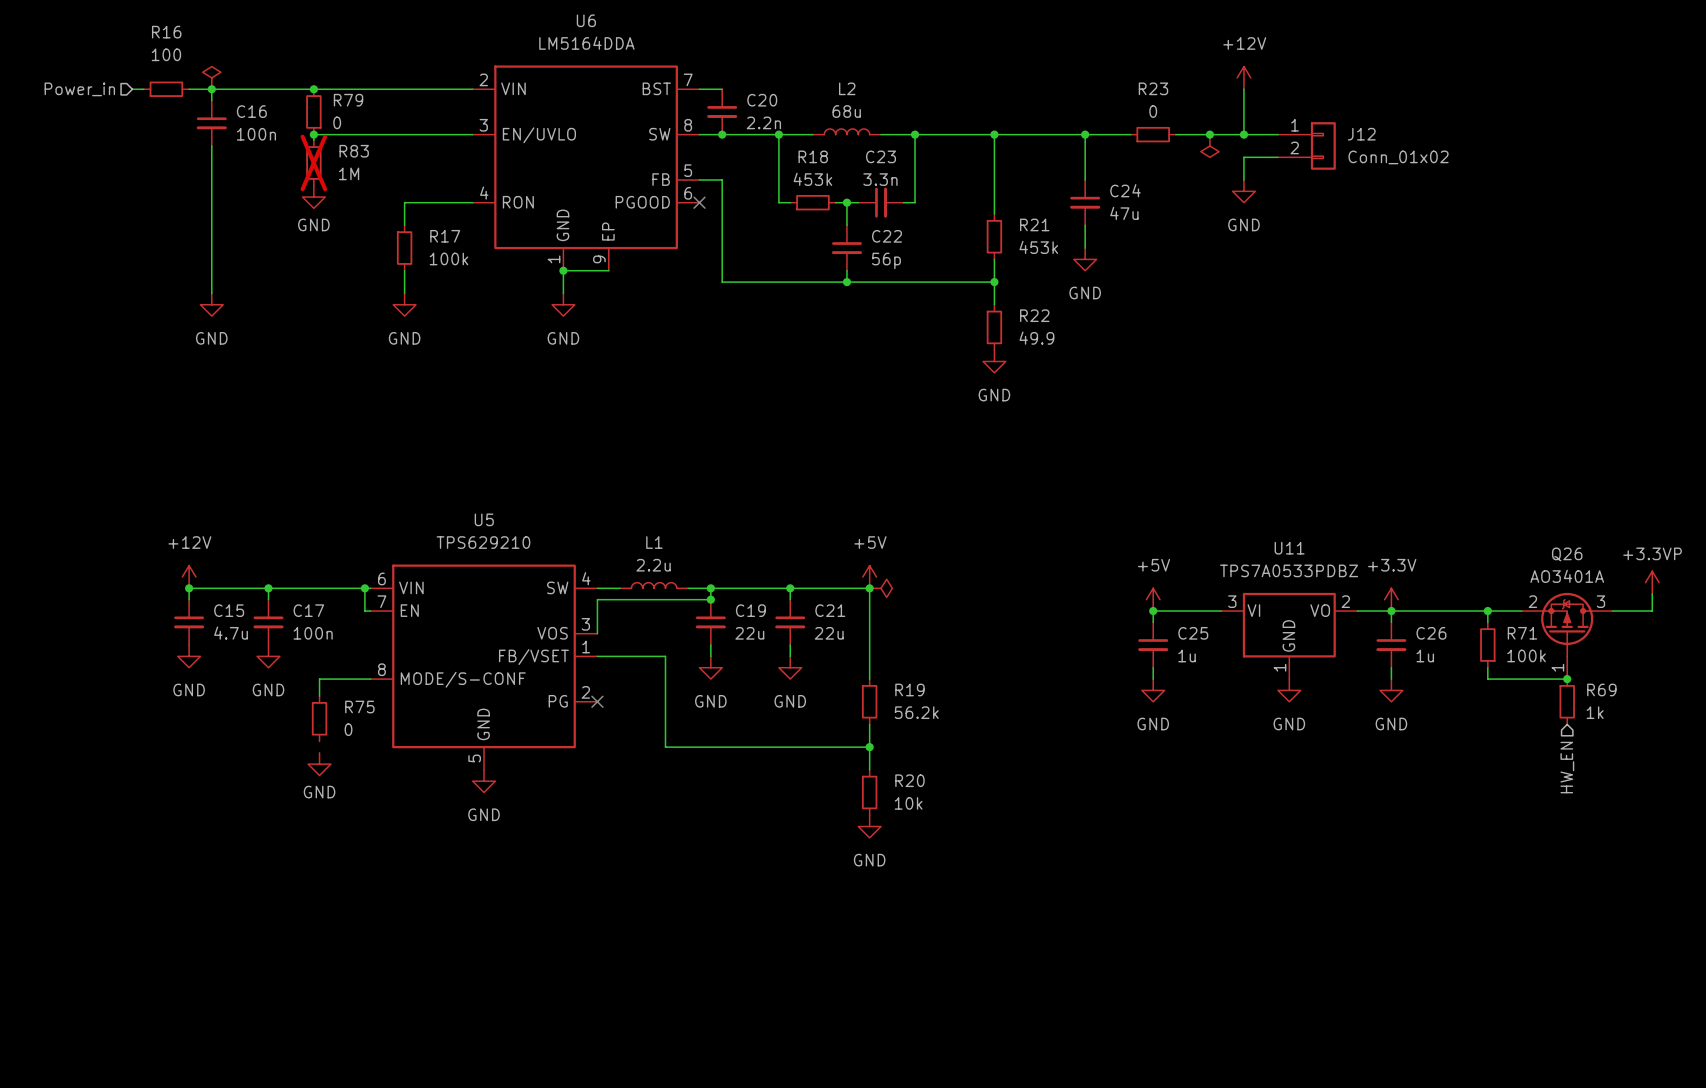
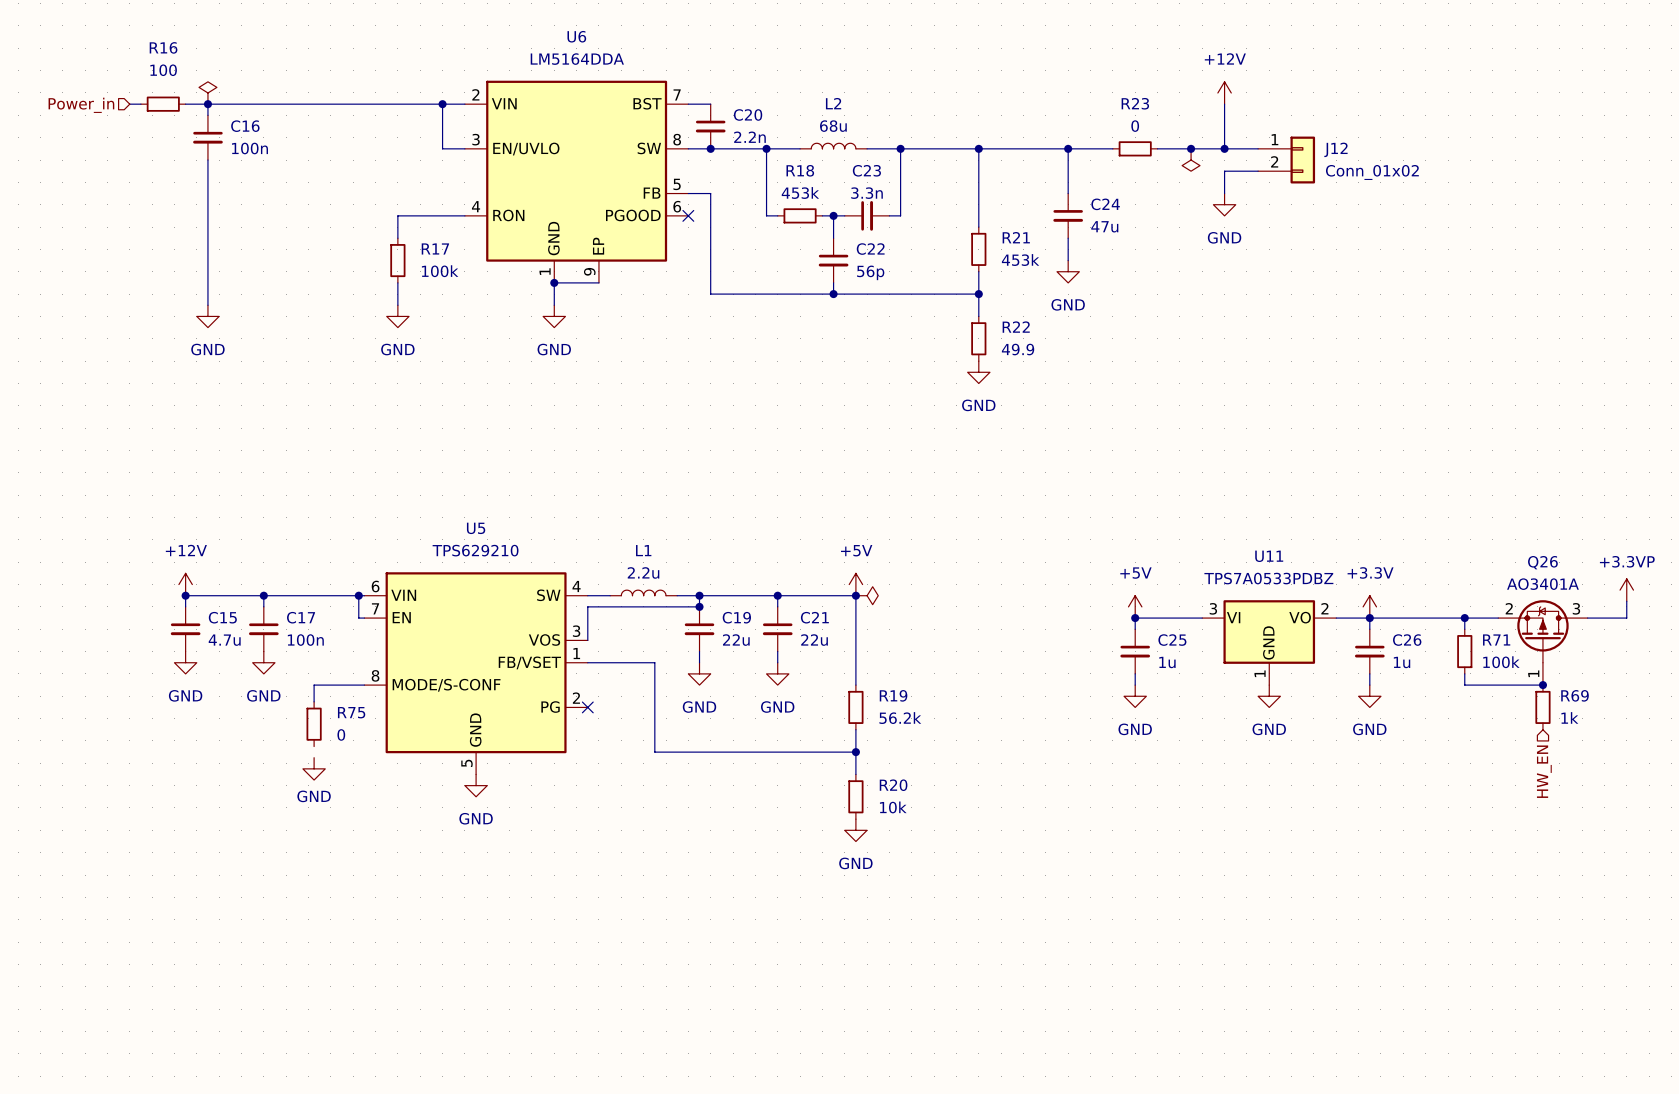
junction: (313, 89) -> none
junction: none -> (442, 104)
R79: 0 (313, 111) -> none
junction: (313, 134) -> none
wire: (449, 134) (313, 134) (313, 140) -> (442, 148) (442, 104)
R83: 1M (313, 162) -> none
power symbol: GND (313, 197) -> none

